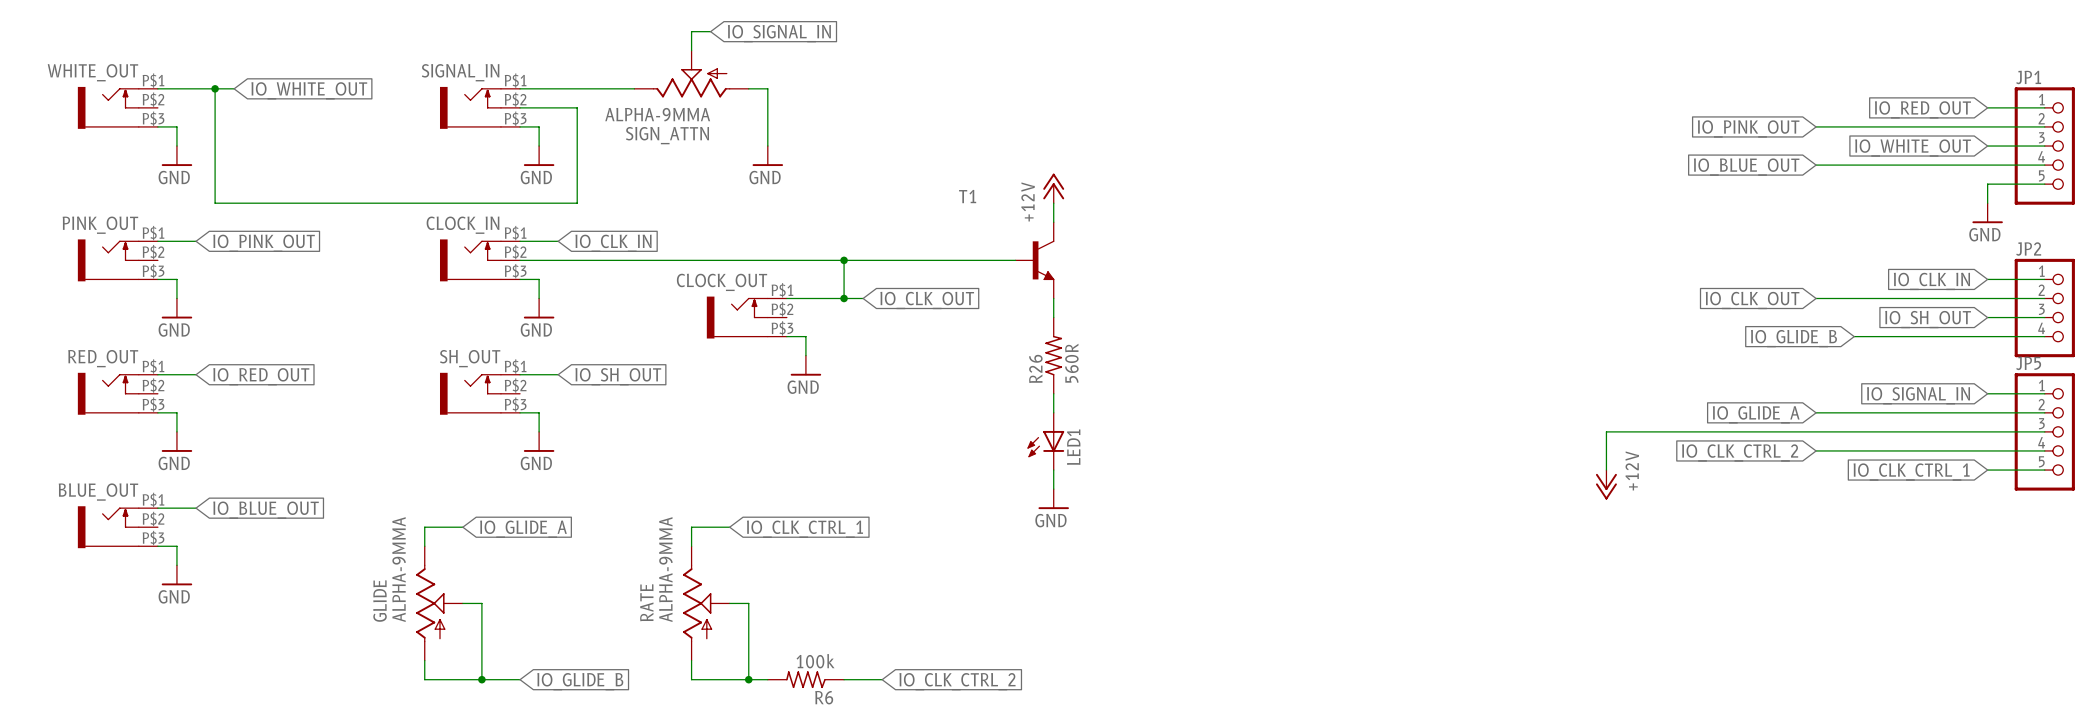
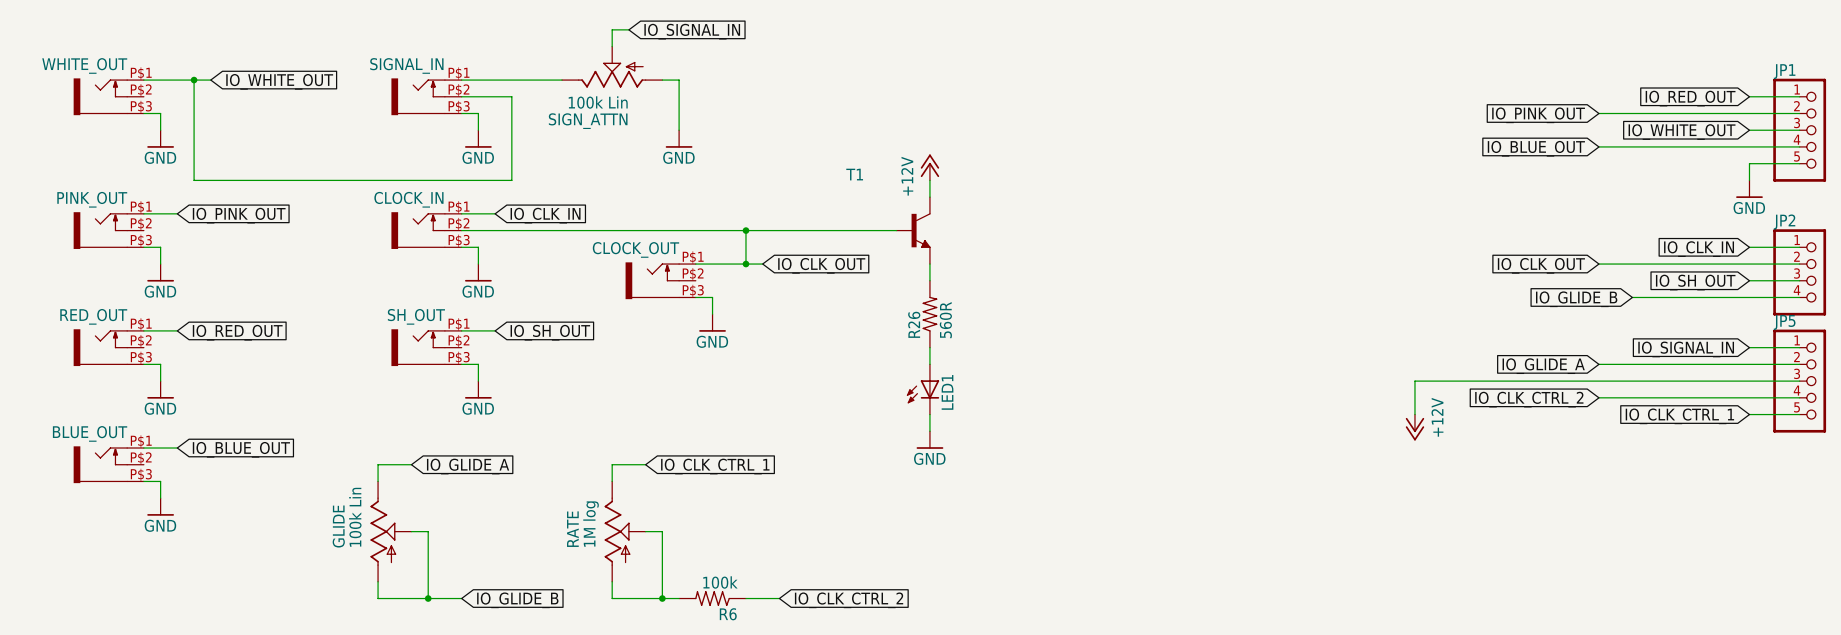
SIGN_ATTN value: ALPHA-9MMA (657, 114) -> 100k Lin (598, 102)
GLIDE value: ALPHA-9MMA (399, 569) -> 100k Lin (355, 517)
RATE value: ALPHA-9MMA (665, 569) -> 1M log (591, 524)

